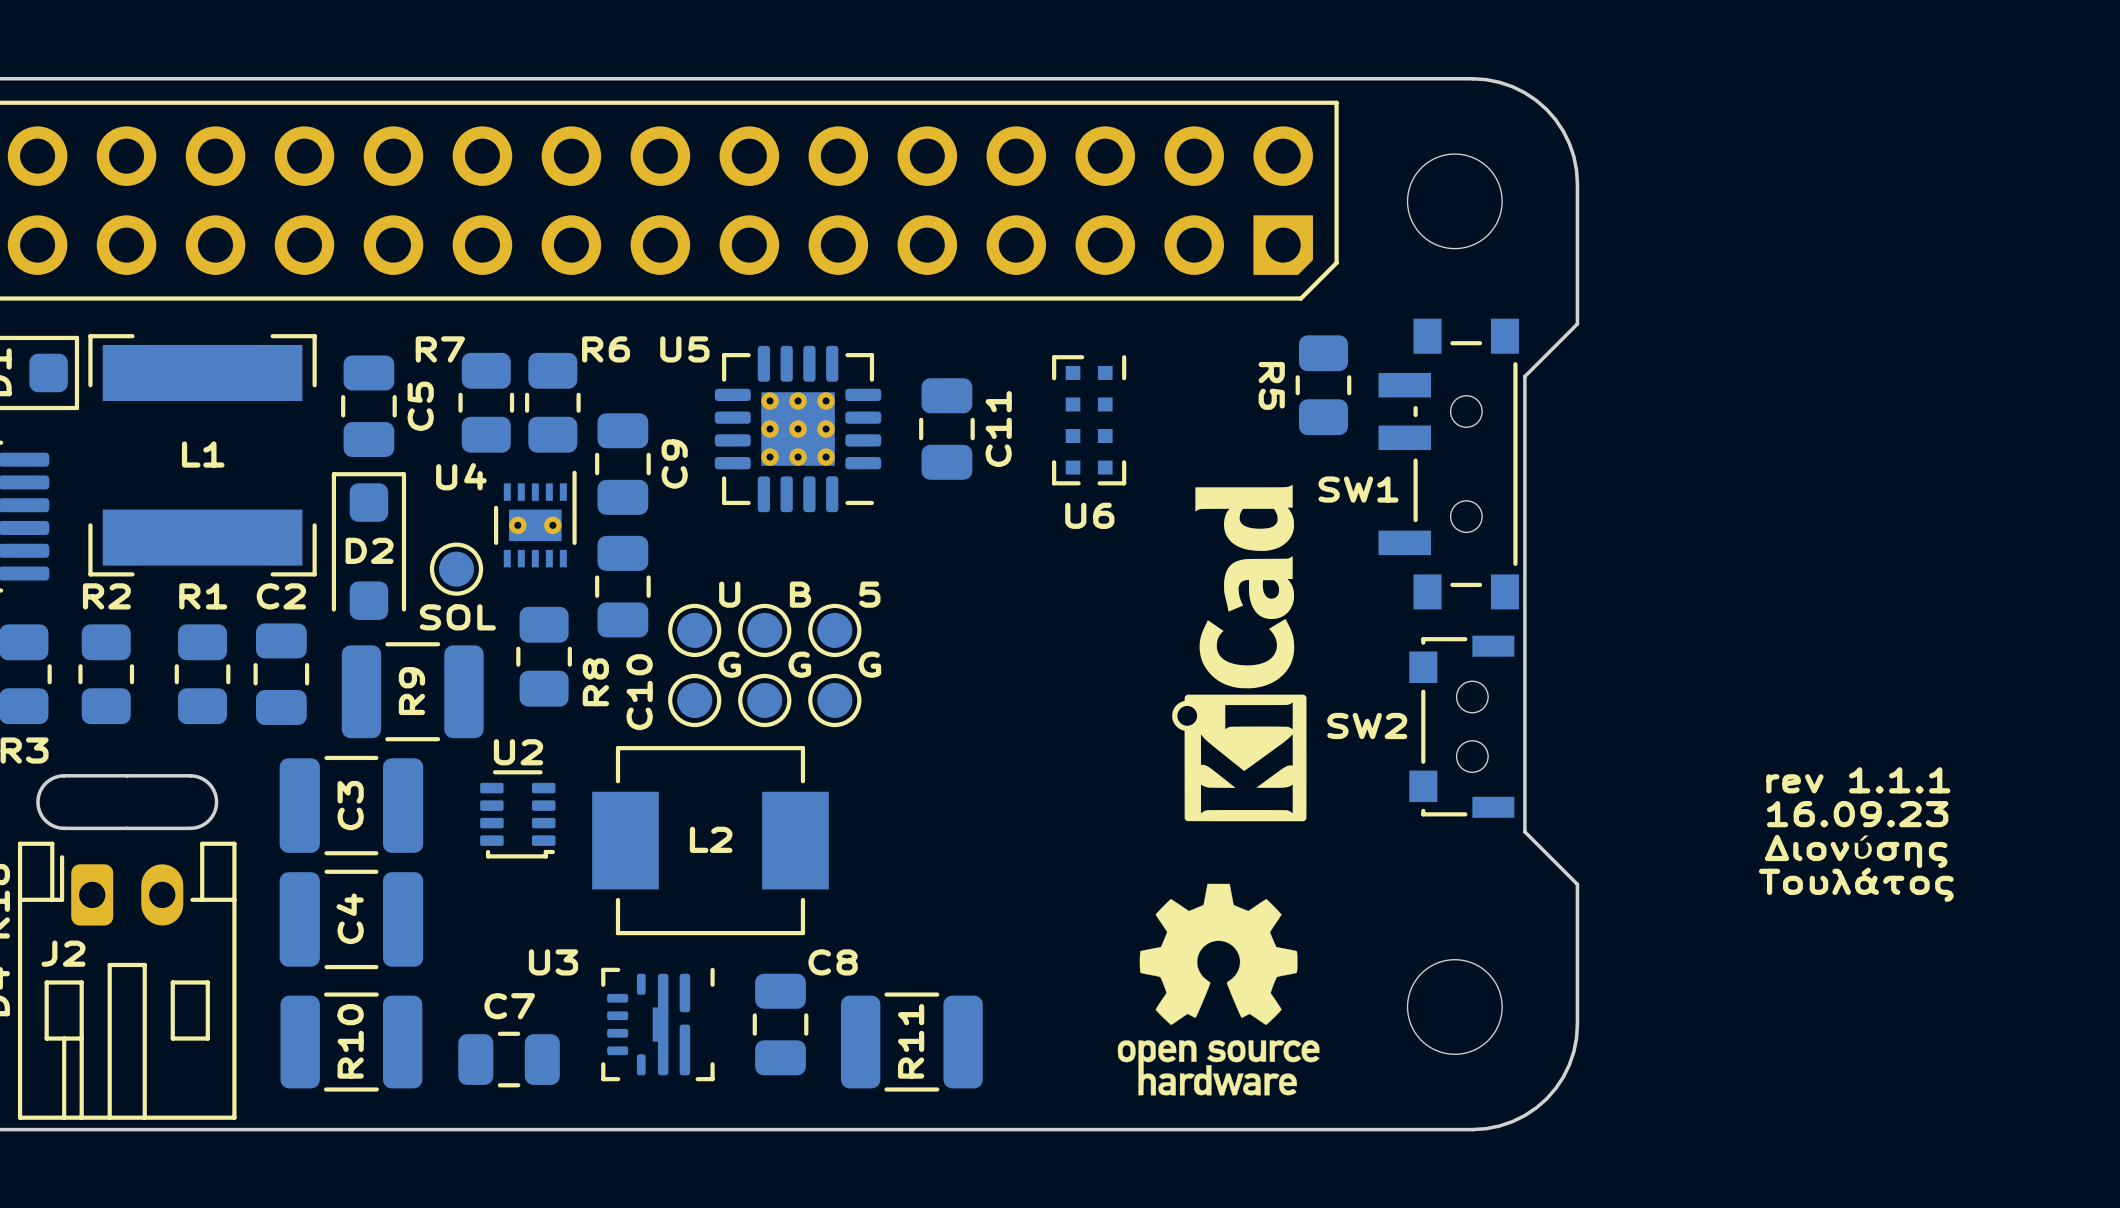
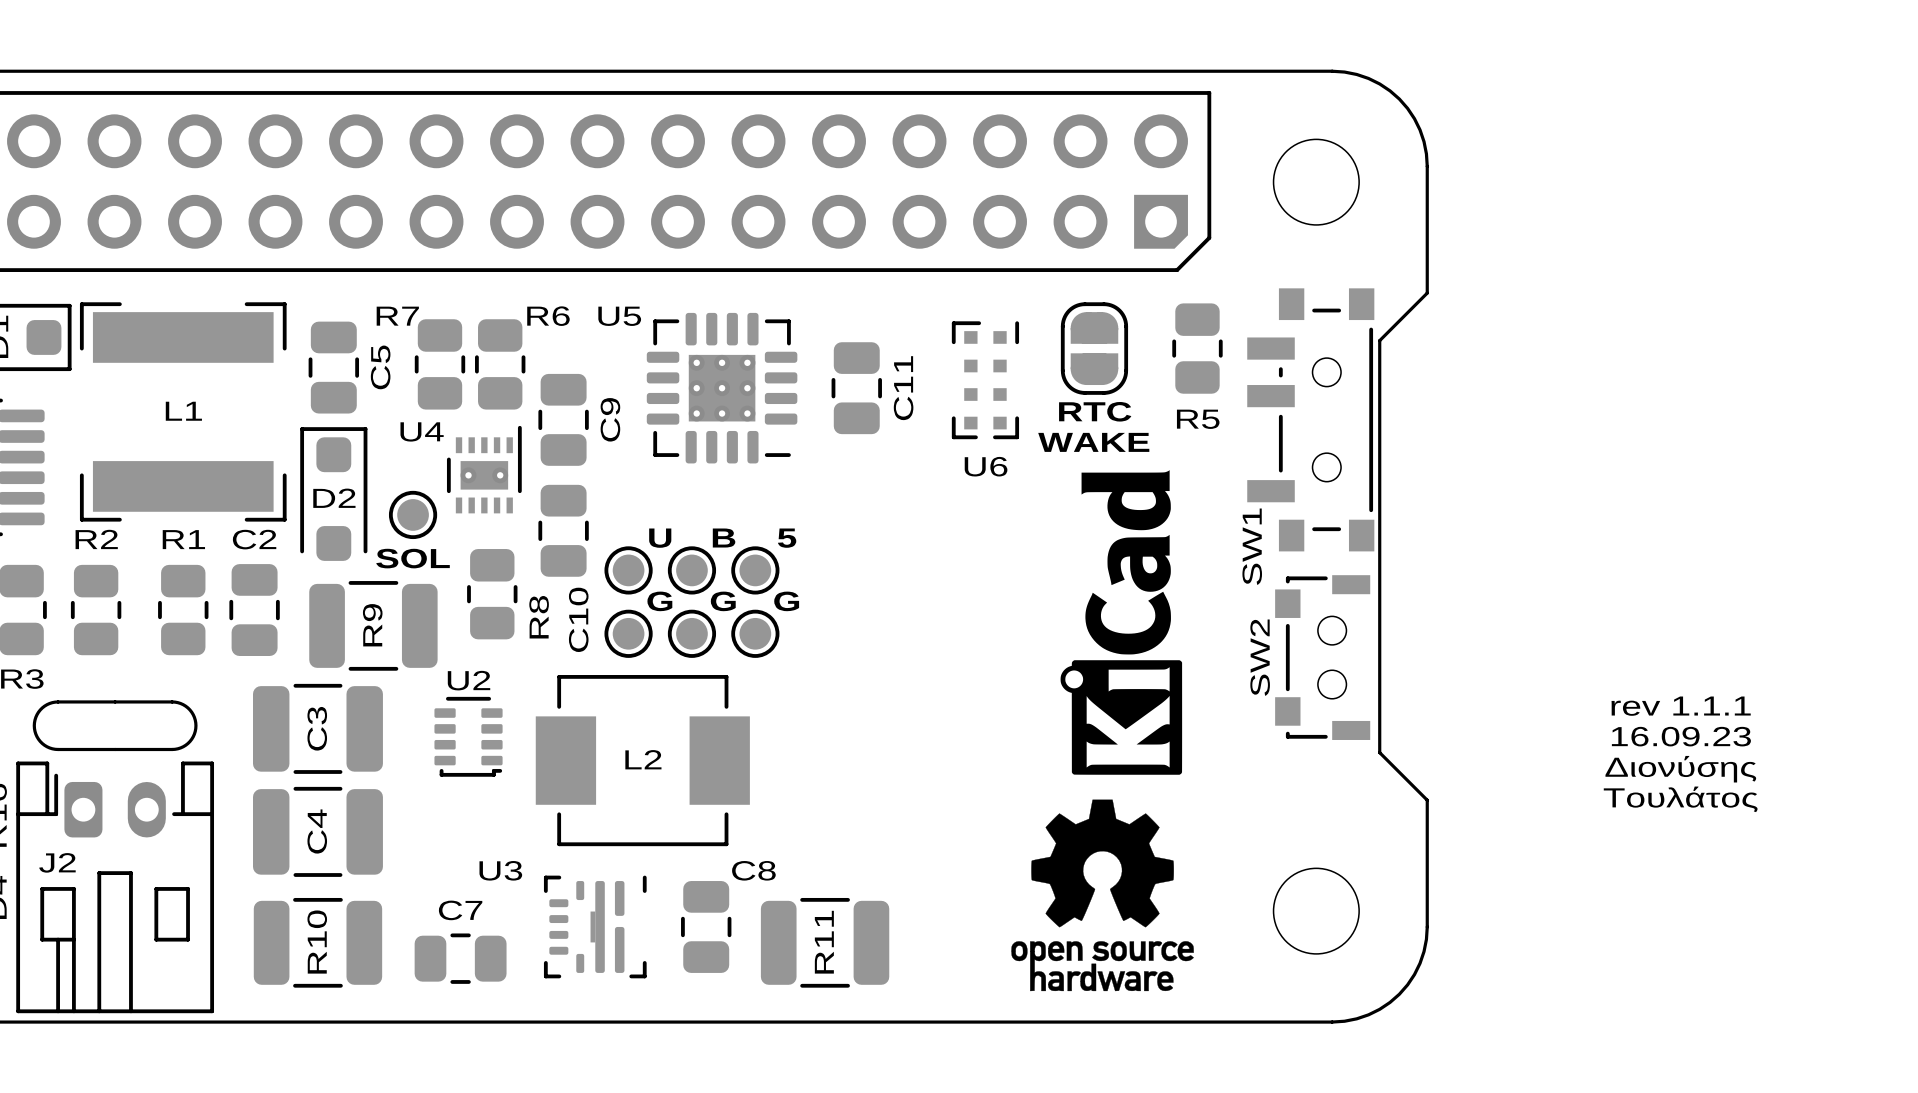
part: none -> (1094, 348)
R5 name rotation: 0° (1271, 385) -> 90° counterclockwise (1198, 419)
R5 name position: R5 (1271, 385) -> R5 (1198, 419)
text: none -> RTC (1095, 411)
text: none -> WAKE (1093, 442)
SW1 name rotation: 0° (1358, 489) -> 90° counterclockwise (1252, 546)
SW1 name position: SW1 (1358, 489) -> SW1 (1252, 546)
drawing position: (1239, 652) -> (1121, 622)
SW2 name rotation: 0° (1367, 725) -> 90° counterclockwise (1260, 657)

